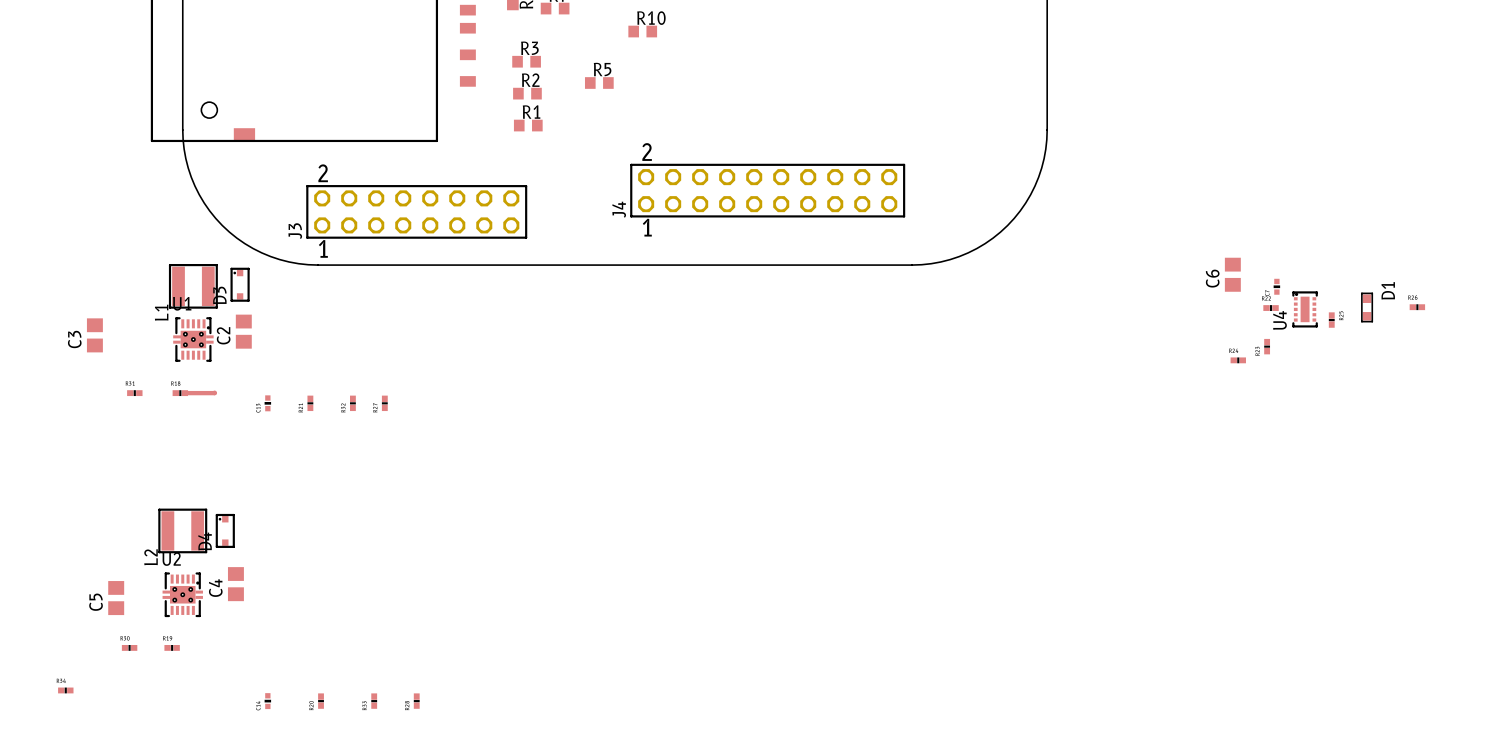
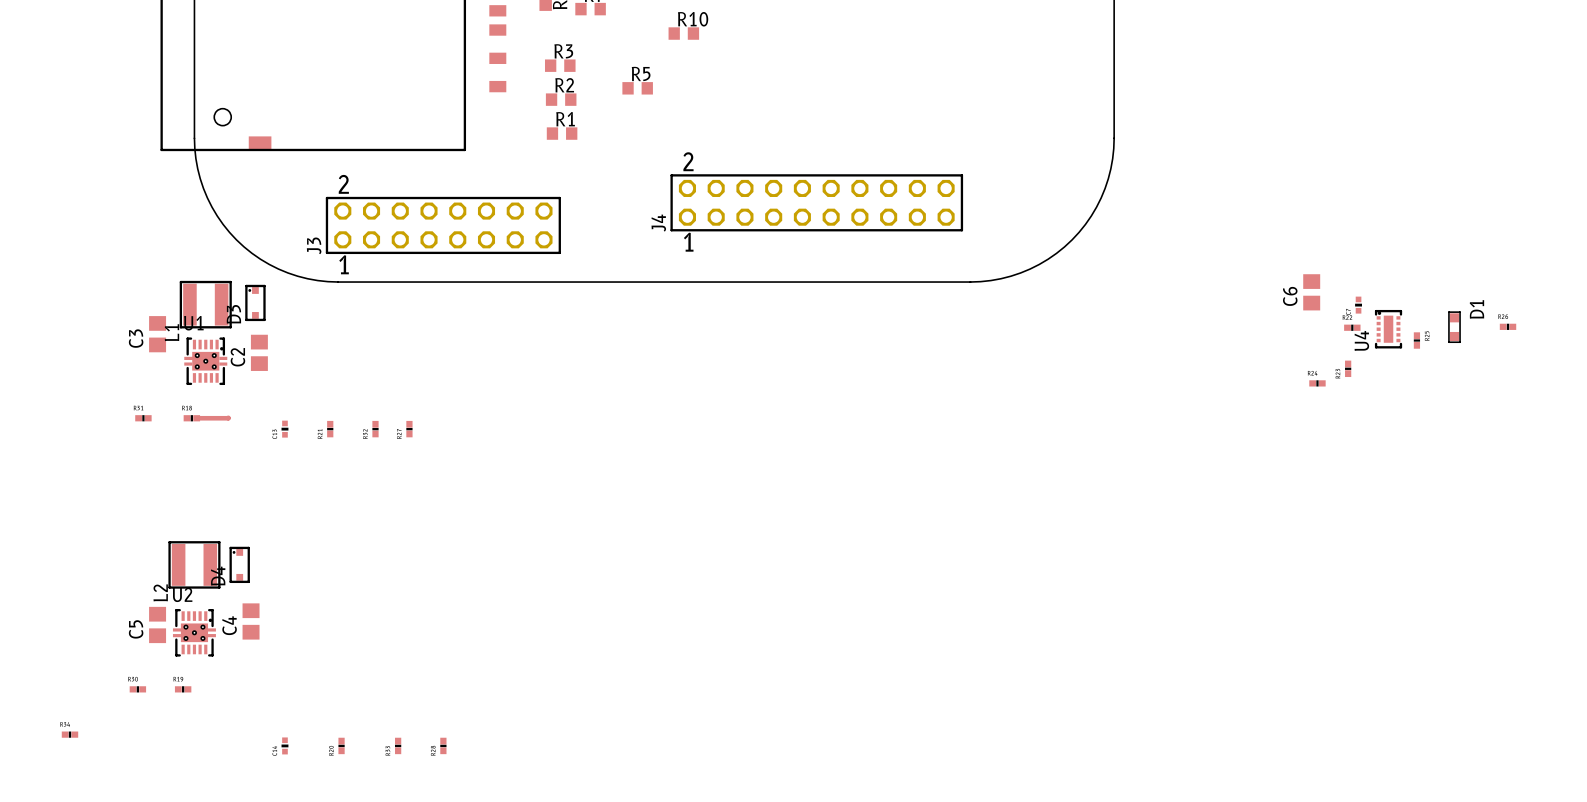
C3 position: (94, 335) -> (157, 334)
C5 position: (116, 598) -> (157, 624)

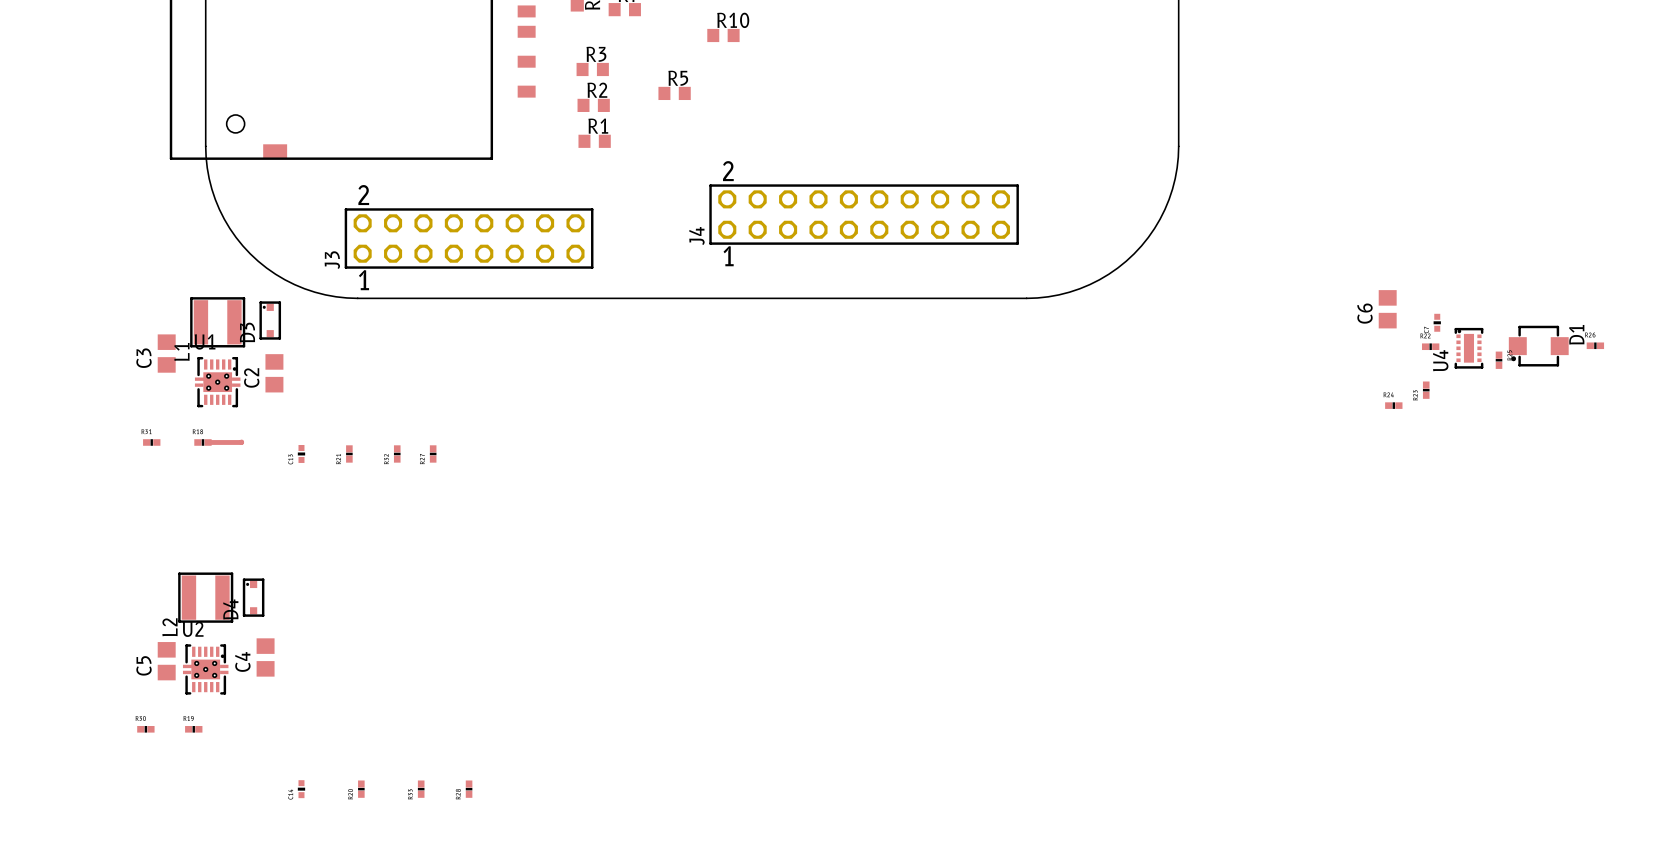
D1 footprint: [1448, 311, 1461, 343] -> [1508, 325, 1569, 367]
part: (69, 734) -> none

